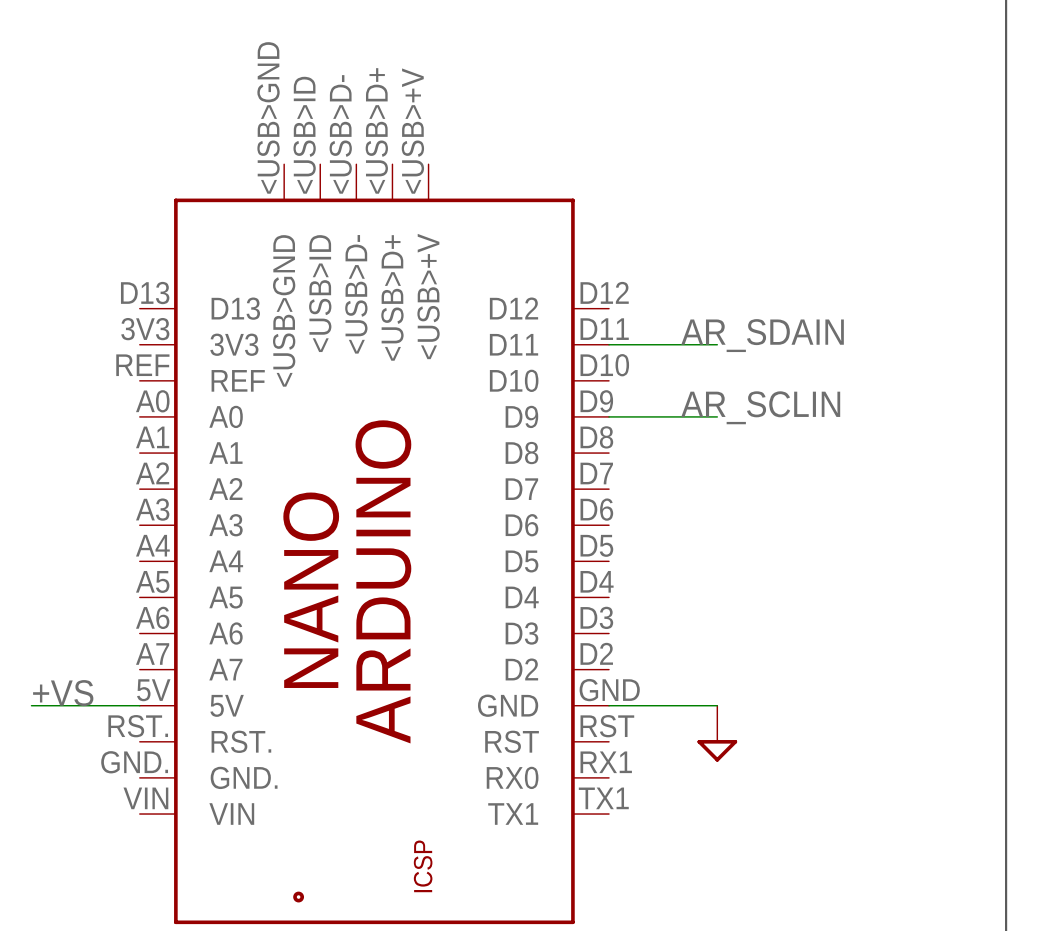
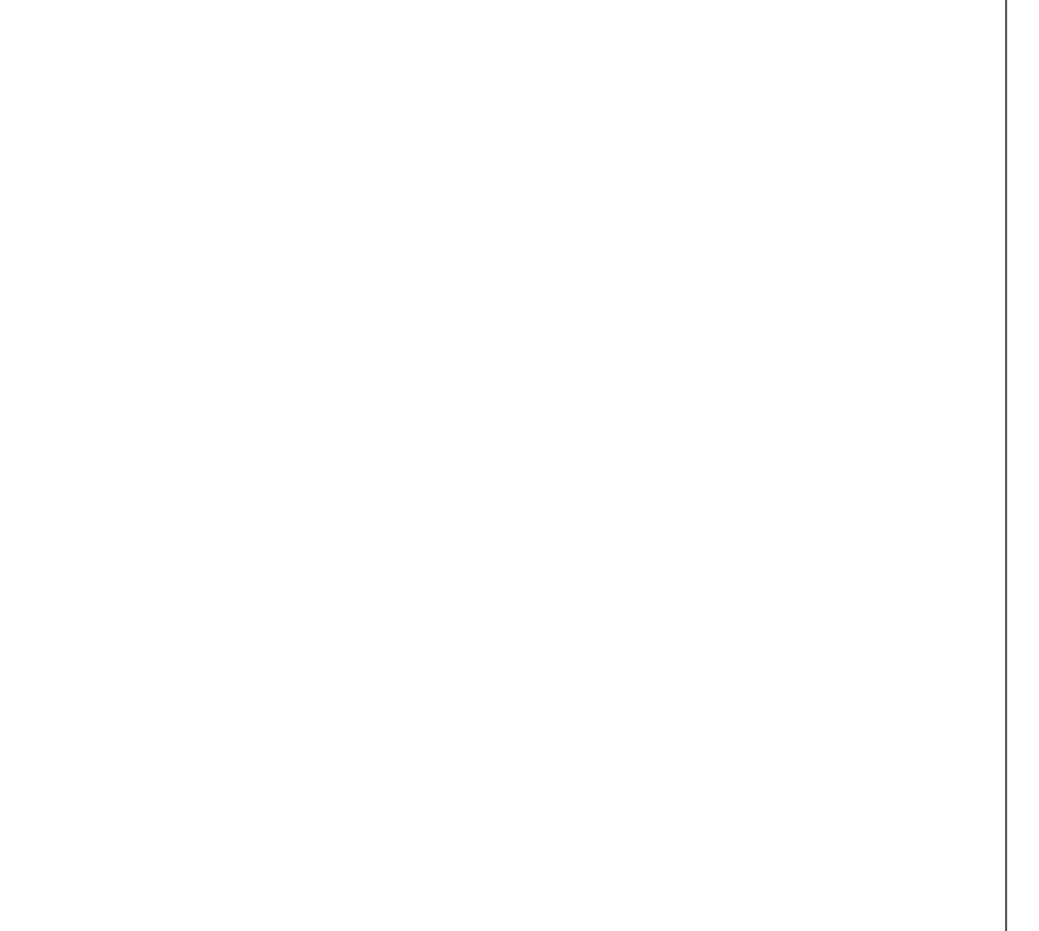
label: AR_SDAIN (762, 335) -> none
wire: (609, 344) (717, 344) -> none
label: AR_SCLIN (760, 407) -> none
wire: (609, 416) (717, 416) -> none
part: (374, 544) -> none
label: +VS (63, 693) -> none
wire: (31, 705) (139, 705) -> none
wire: (609, 705) (717, 705) -> none
power symbol: (717, 733) -> none

